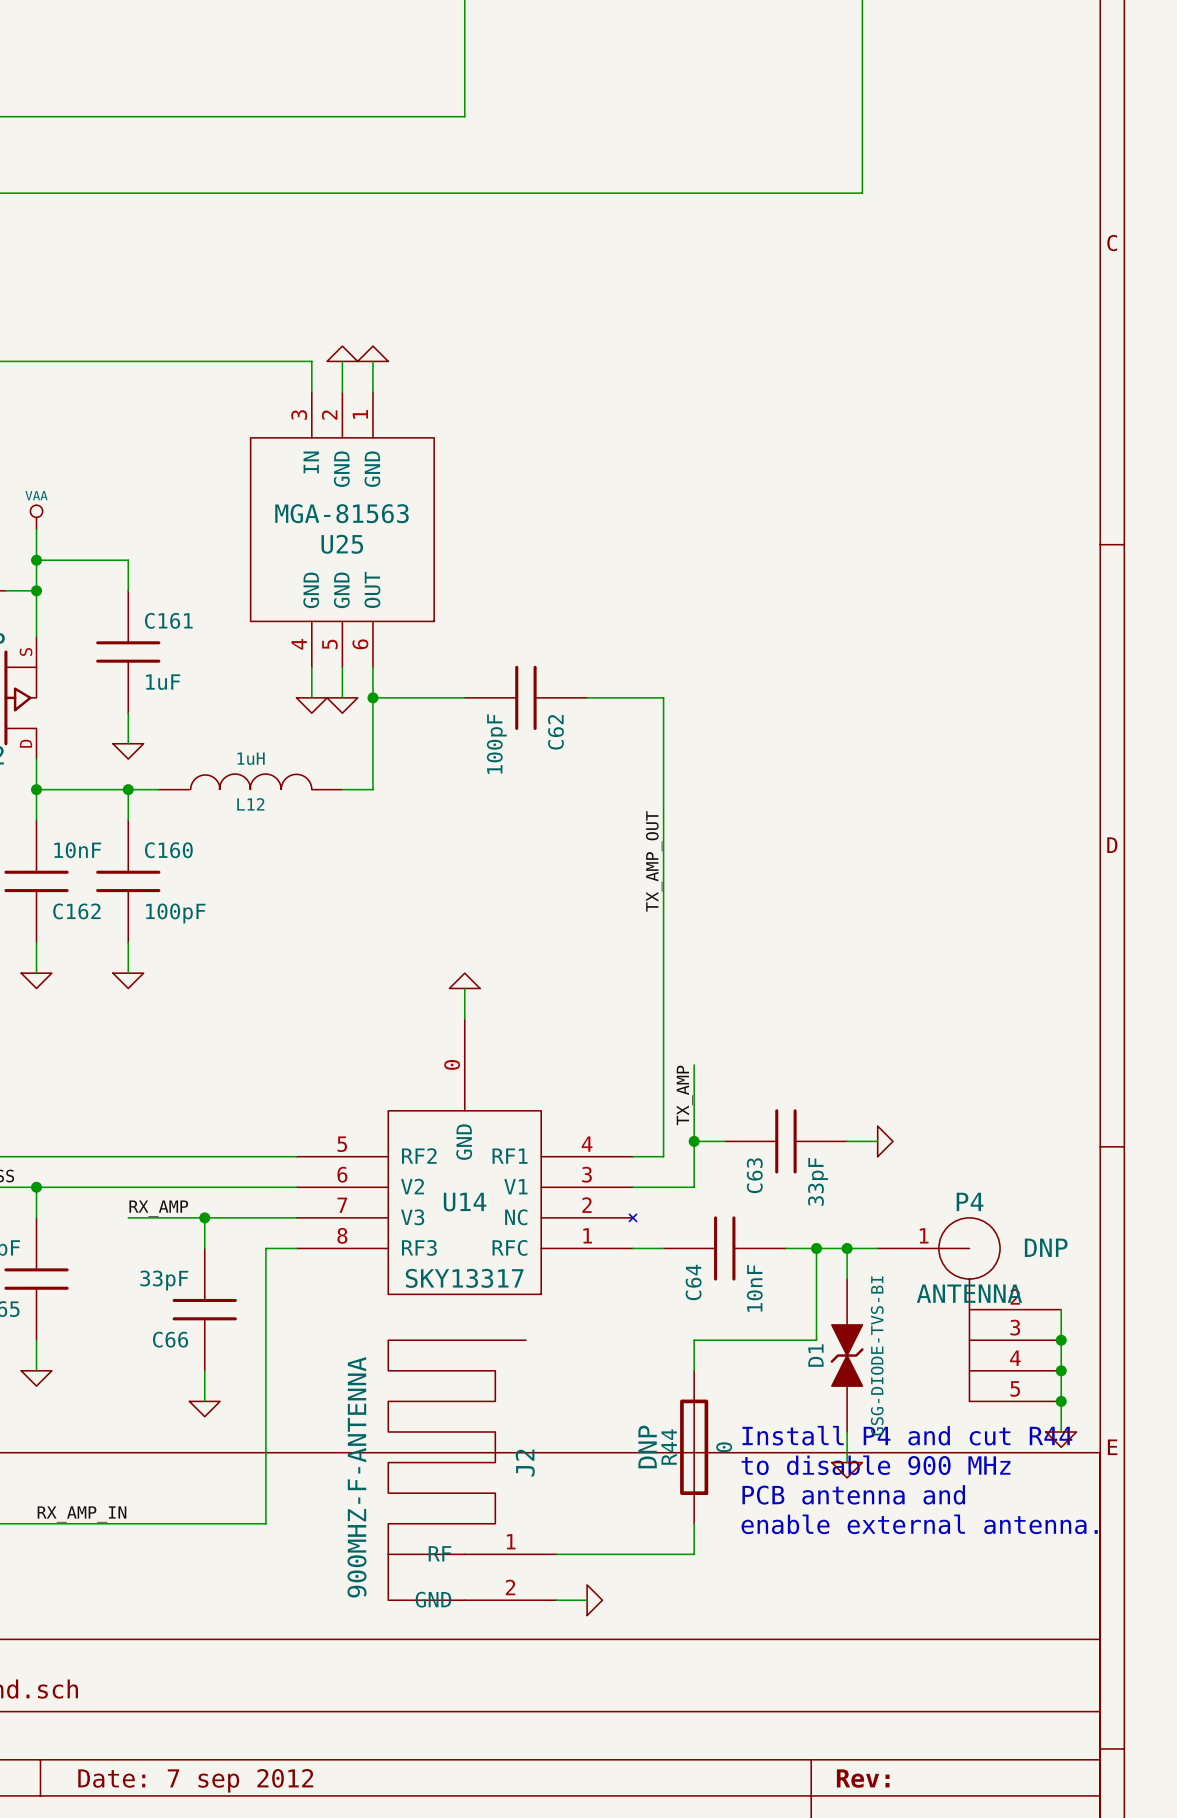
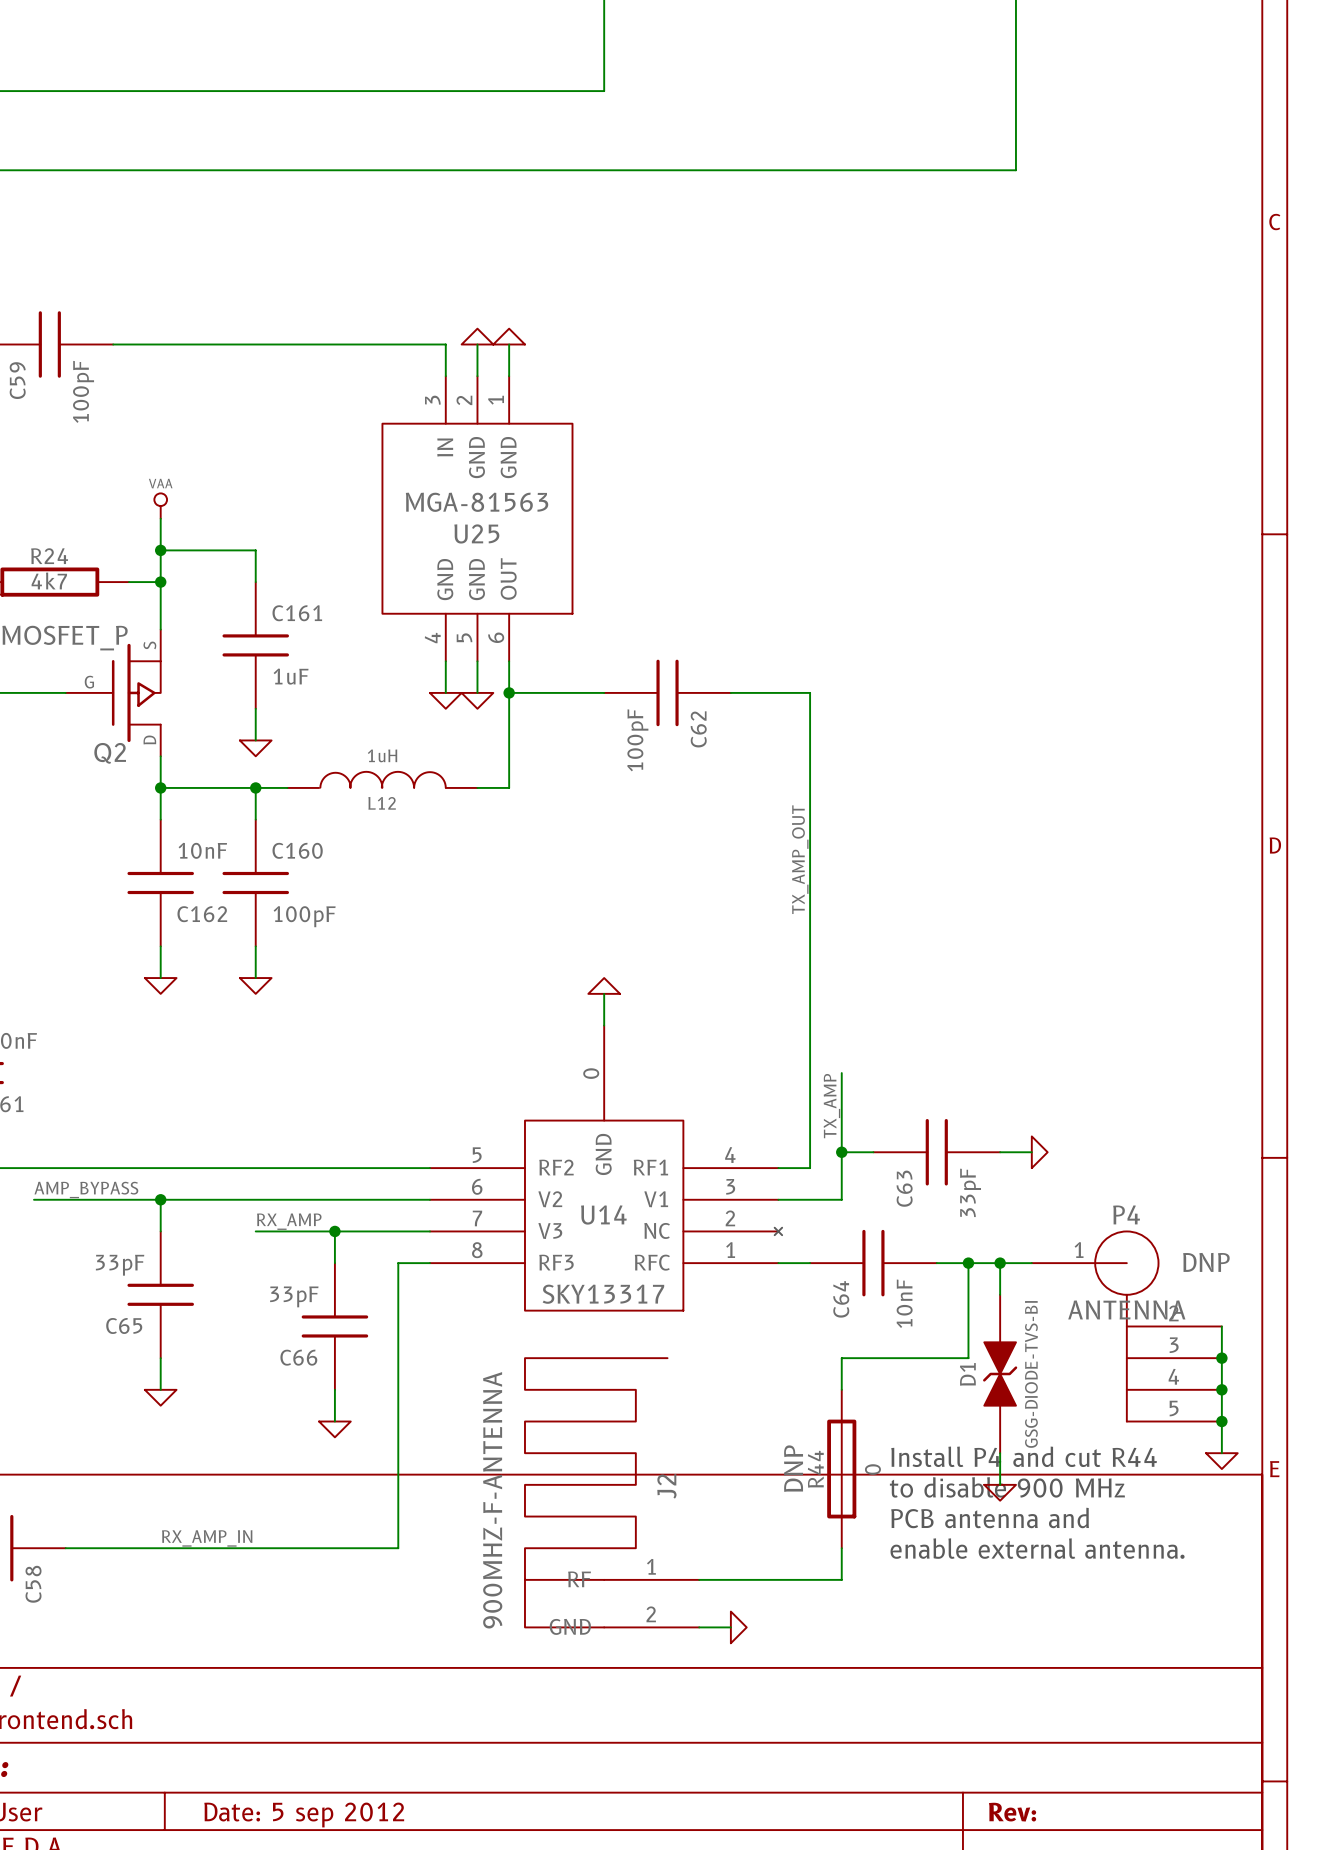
title block: Date: 7 sep 2012 (195, 1780) -> Date: 5 sep 2012 (304, 1814)

